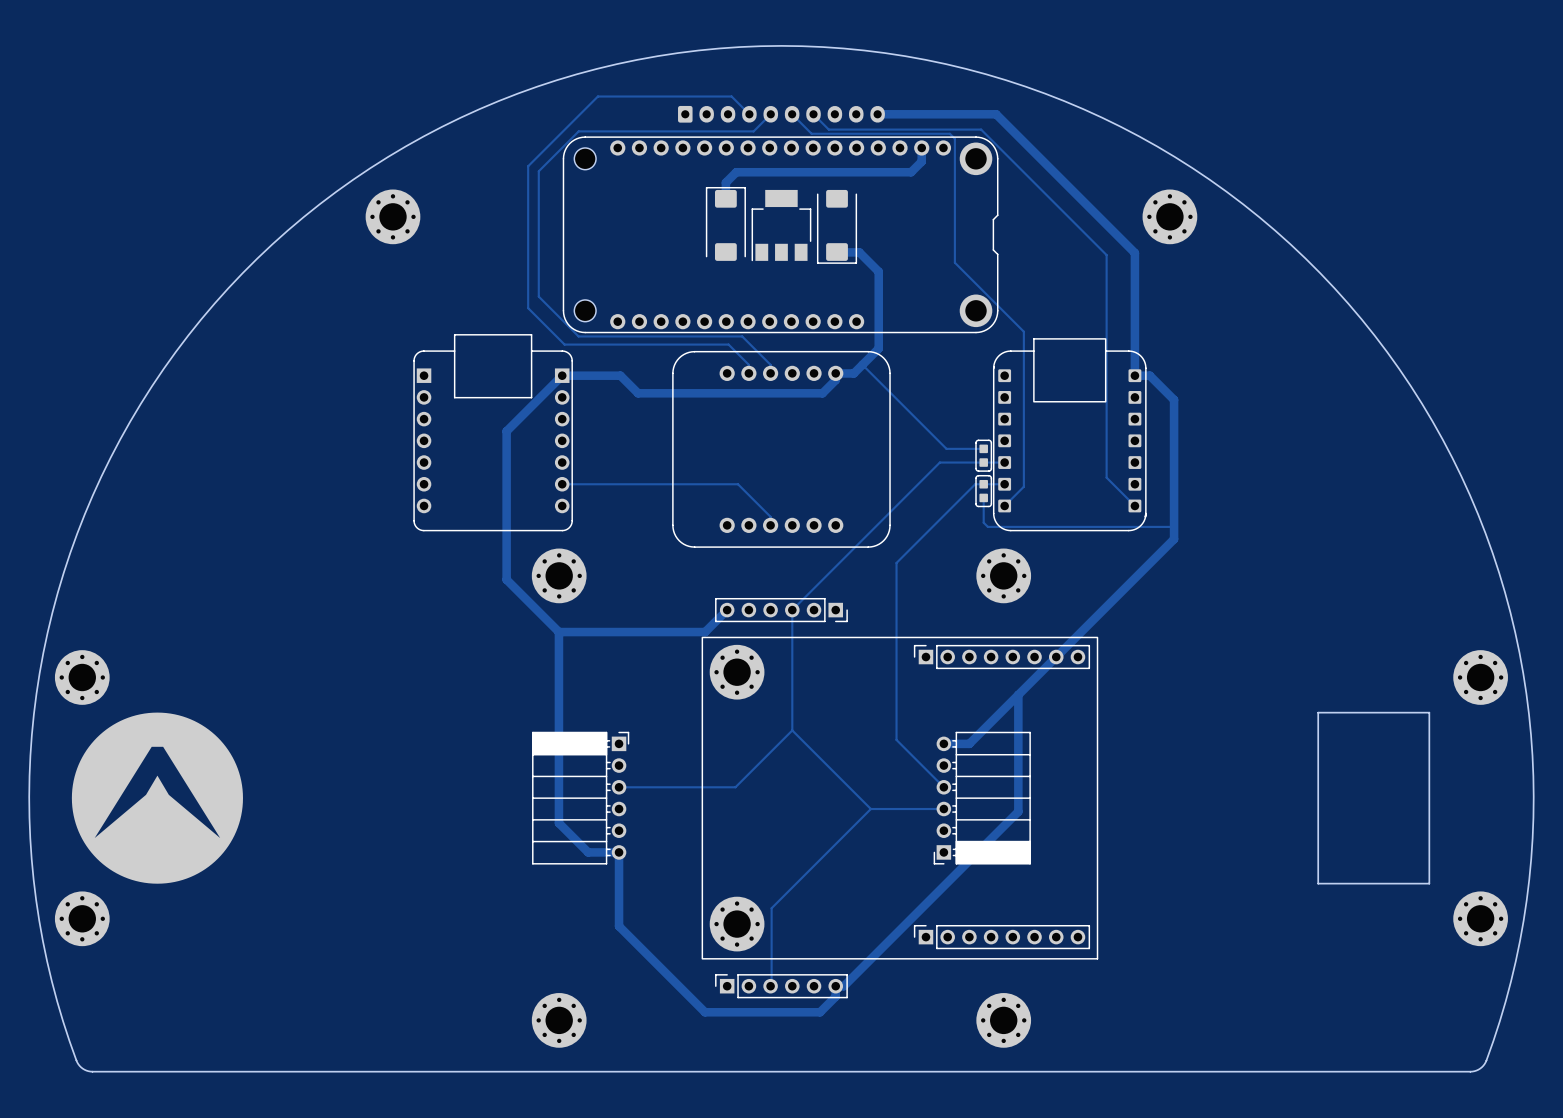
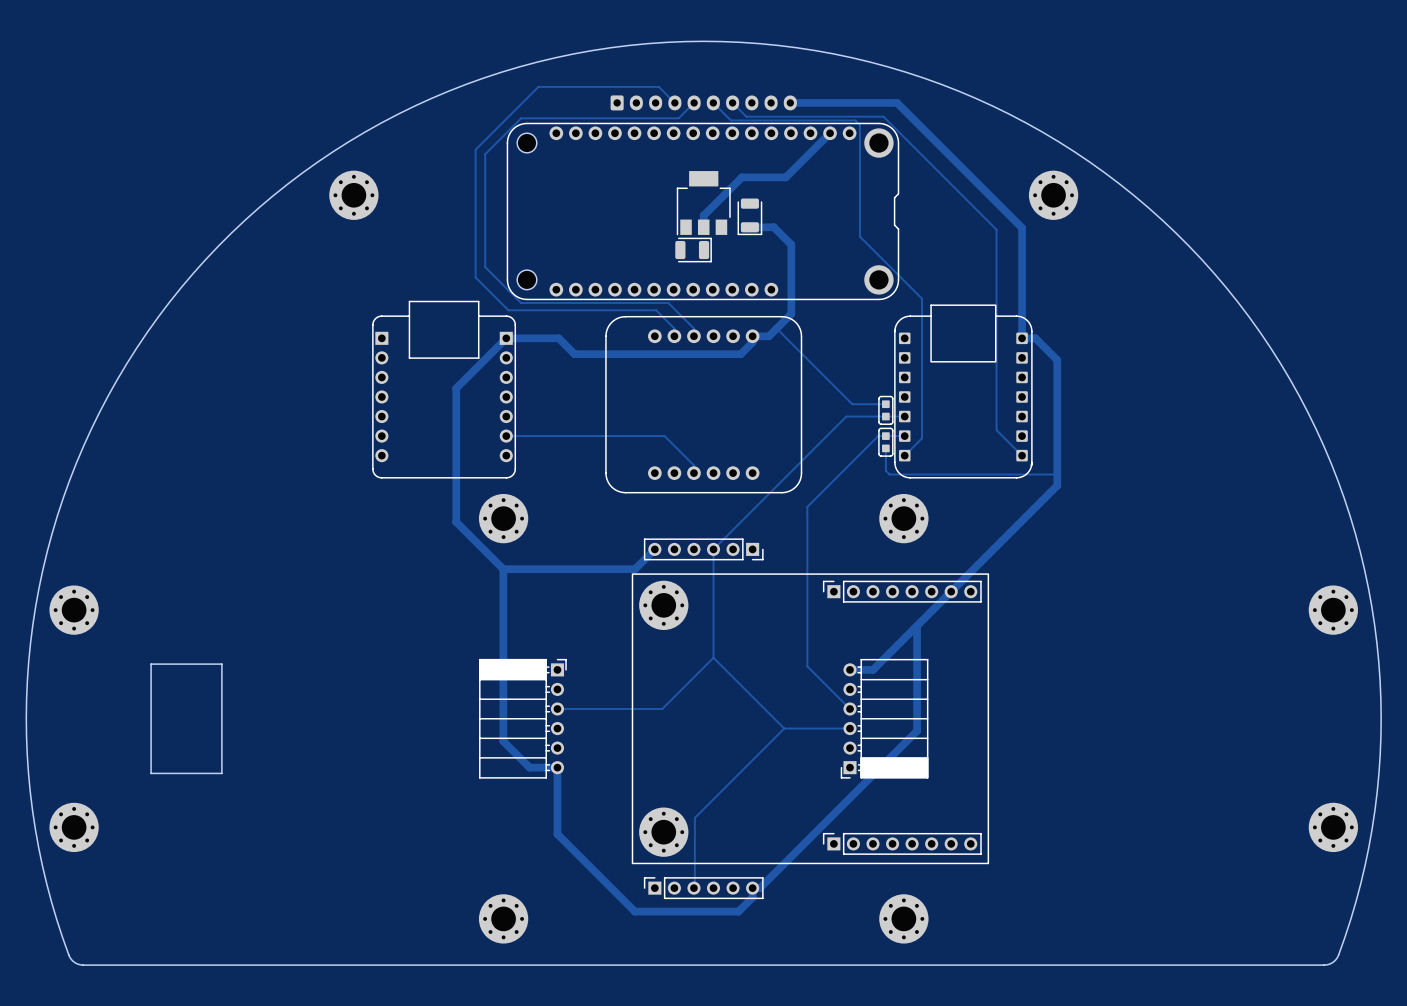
track: (921, 147) (921, 161) (911, 172) (736, 172) (725, 182) (725, 198) -> (830, 133) (785, 177) (741, 177) (703, 215) (703, 227)
part: (725, 224) -> none
part: (837, 226) -> none
part: none -> (749, 216)
part: none -> (693, 250)
board edge: (1318, 712) (1318, 883) (1429, 883) (1429, 712) (1318, 712) -> none
board edge: none -> (151, 664) (151, 773) (221, 773) (221, 664) (151, 664)
part: (157, 798) -> none

